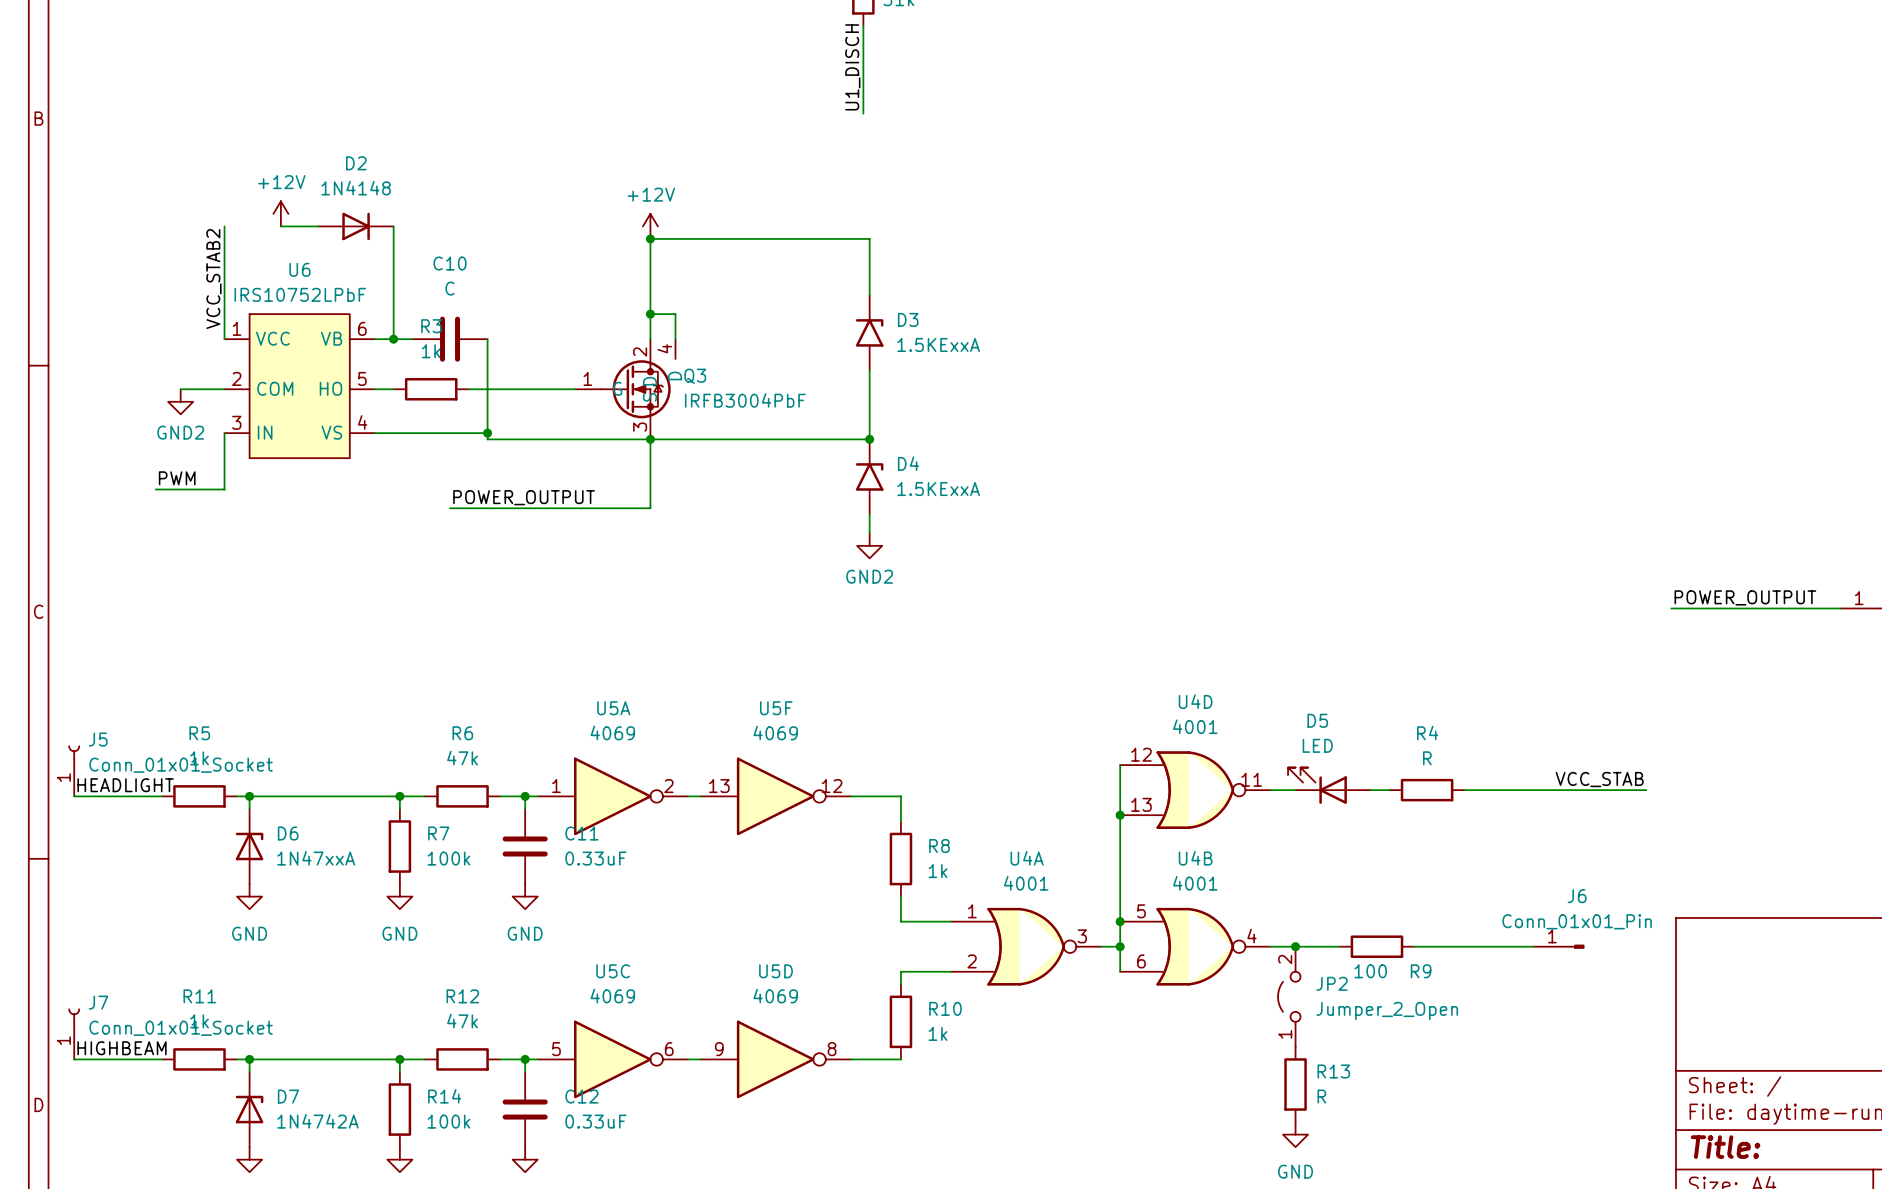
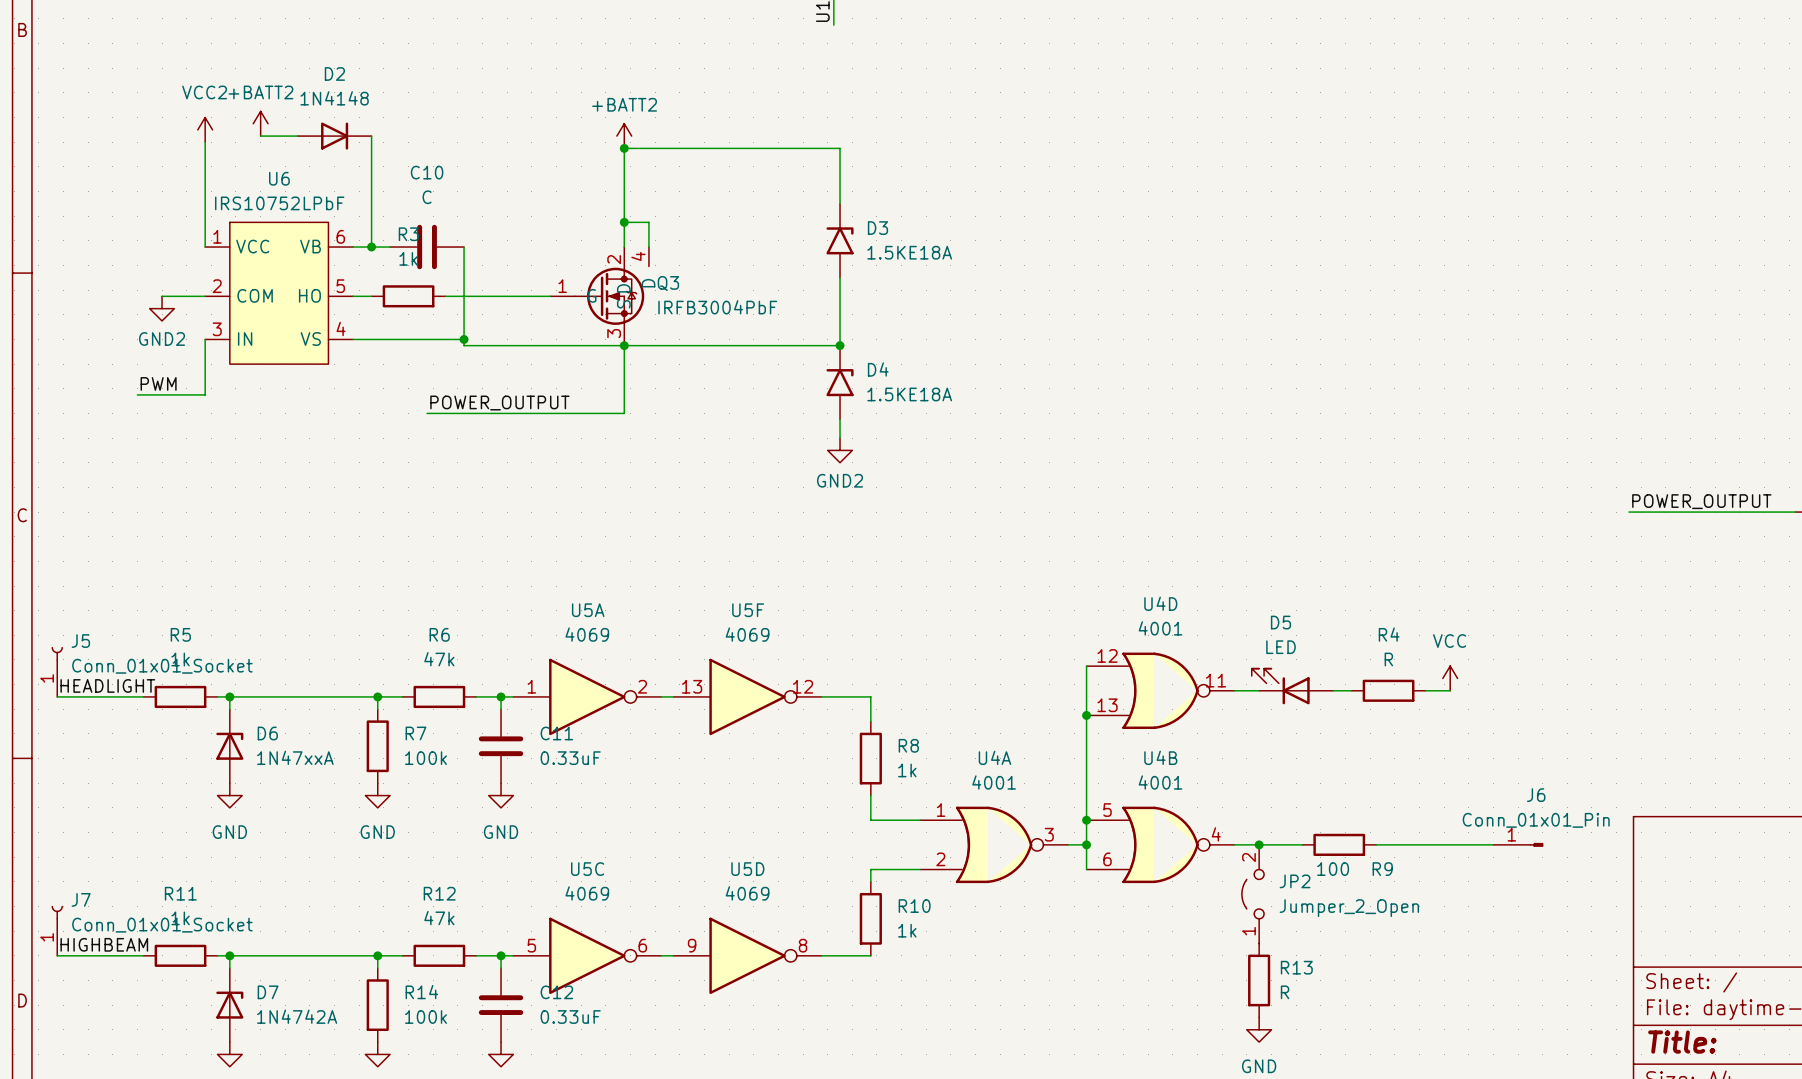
power symbol: +12V (280, 213) -> +BATT2 (260, 123)
power symbol: none -> VCC2 (205, 129)
power symbol: +12V (650, 226) -> +BATT2 (624, 136)
label: VCC_STAB2 (213, 279) -> none
D3 value: 1.5KExxA (938, 344) -> 1.5KE18A (909, 252)
D4 value: 1.5KExxA (938, 489) -> 1.5KE18A (909, 394)
power symbol: none -> VCC (1450, 678)
label: VCC_STAB (1599, 779) -> none
wire: (1489, 790) (1646, 790) -> none

